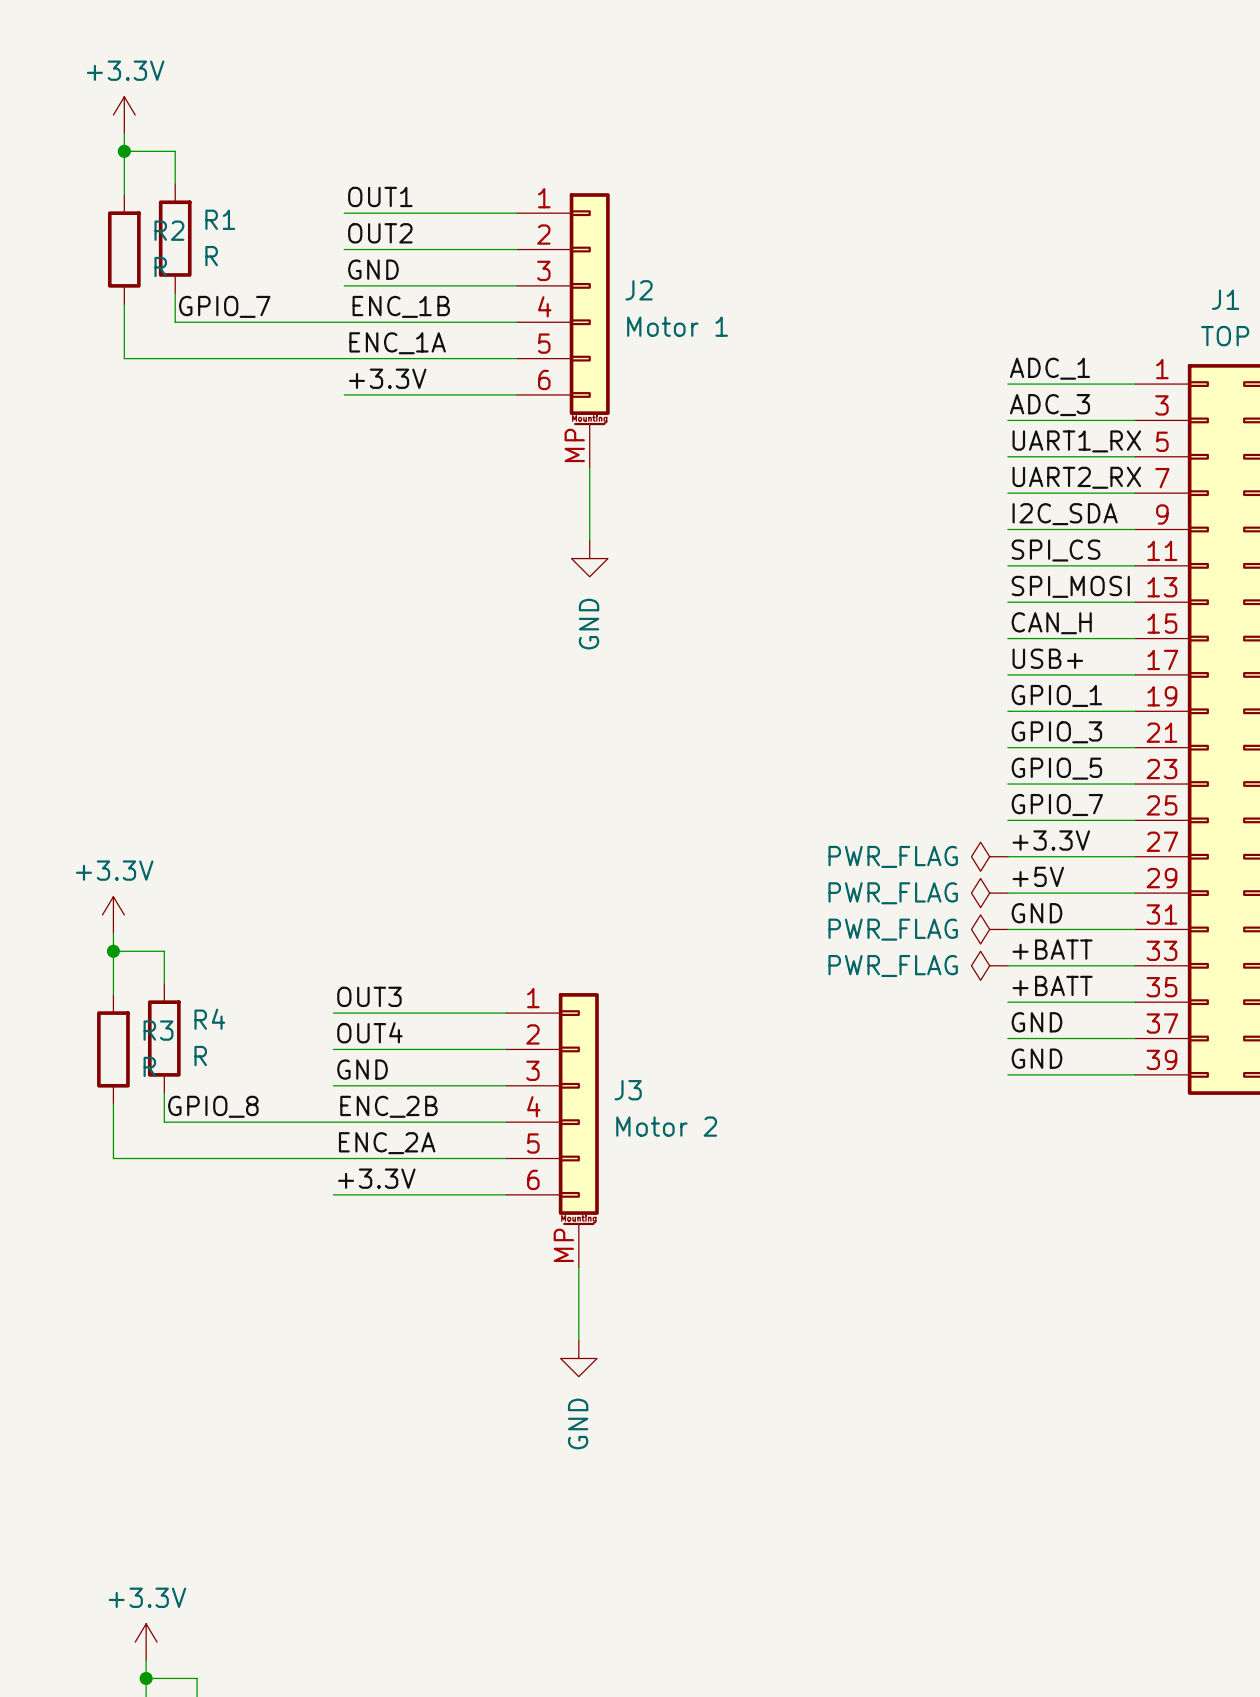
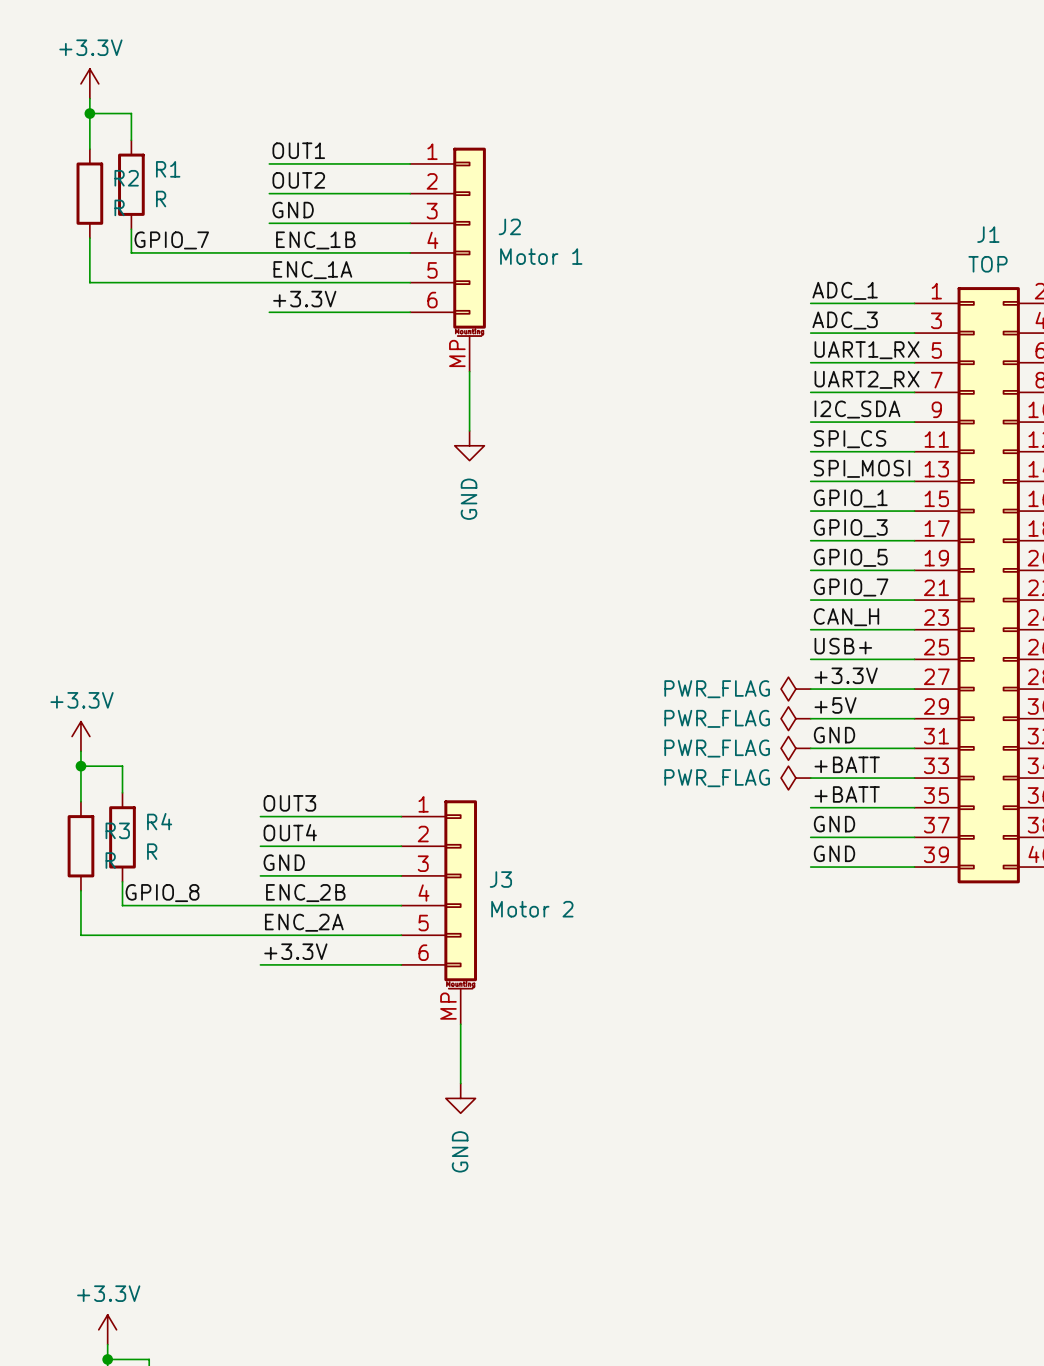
label: CAN_H (1051, 623) -> GPIO_1 (850, 498)
label: USB+ (1047, 658) -> GPIO_3 (850, 528)
label: GPIO_1 (1056, 695) -> GPIO_5 (850, 557)
label: GPIO_3 (1056, 732) -> GPIO_7 (851, 587)
label: GPIO_5 (1056, 768) -> CAN_H (846, 617)
label: GPIO_7 (1057, 805) -> USB+ (843, 646)

